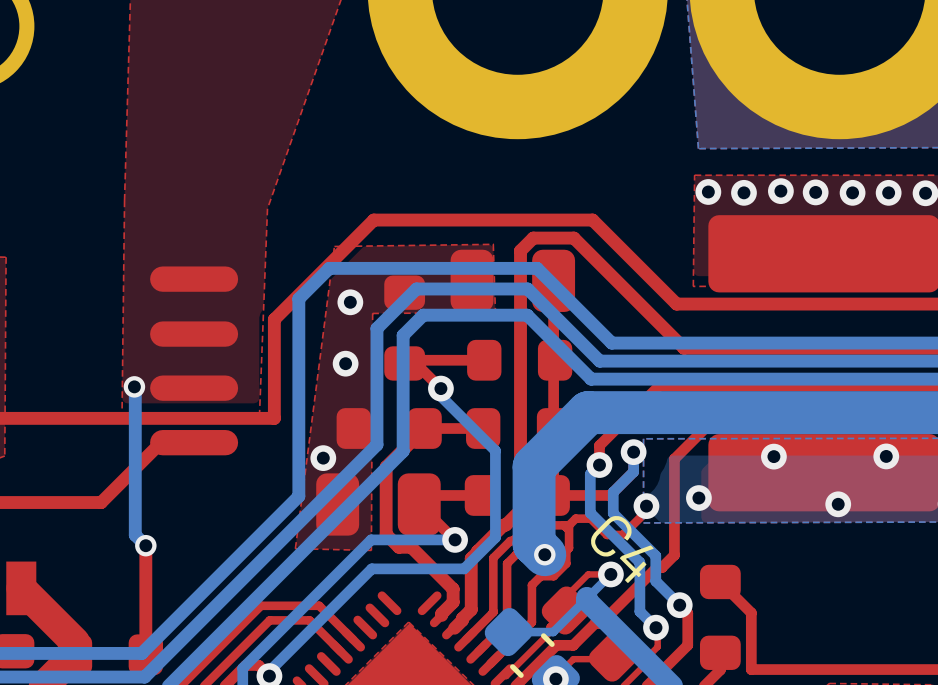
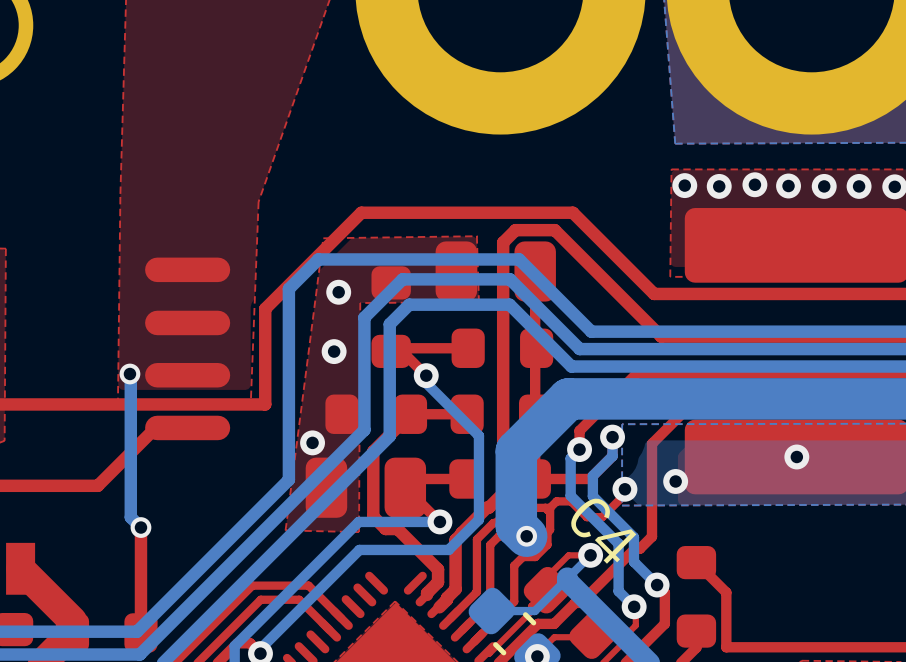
via: (773, 456) -> none
via: (886, 456) -> none
via: none -> (796, 456)
via: (838, 504) -> none

